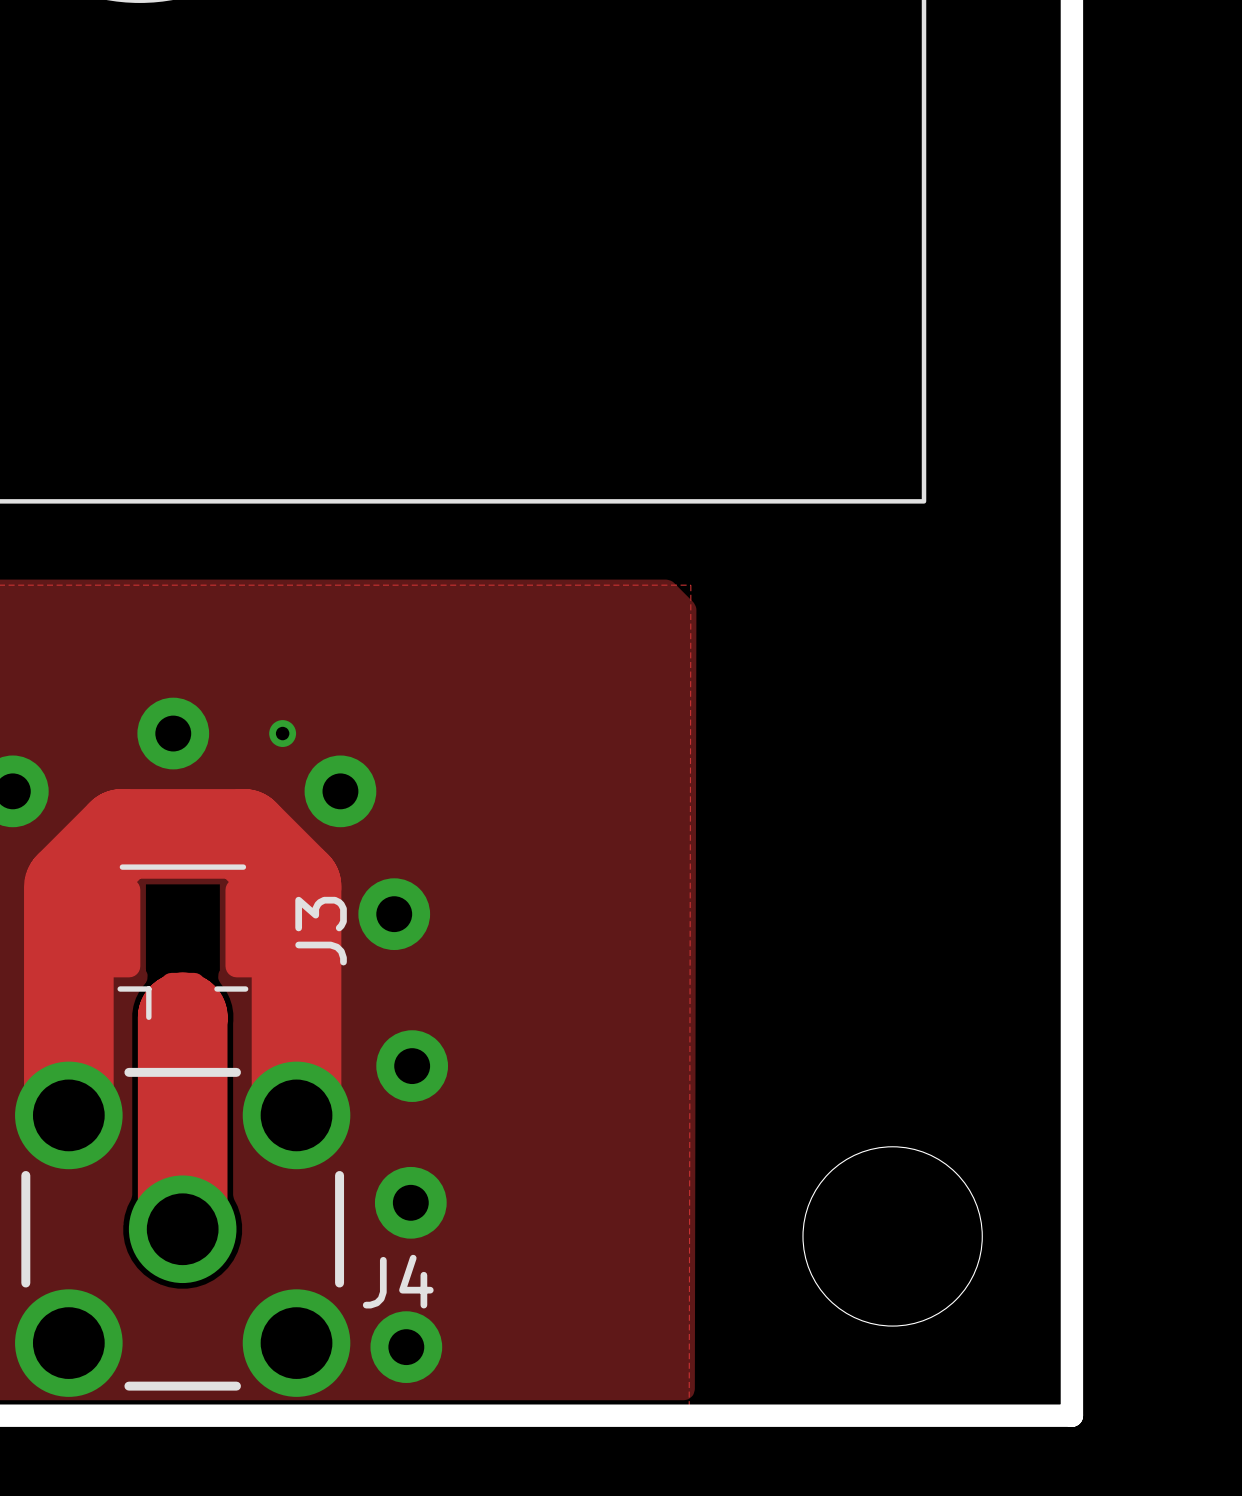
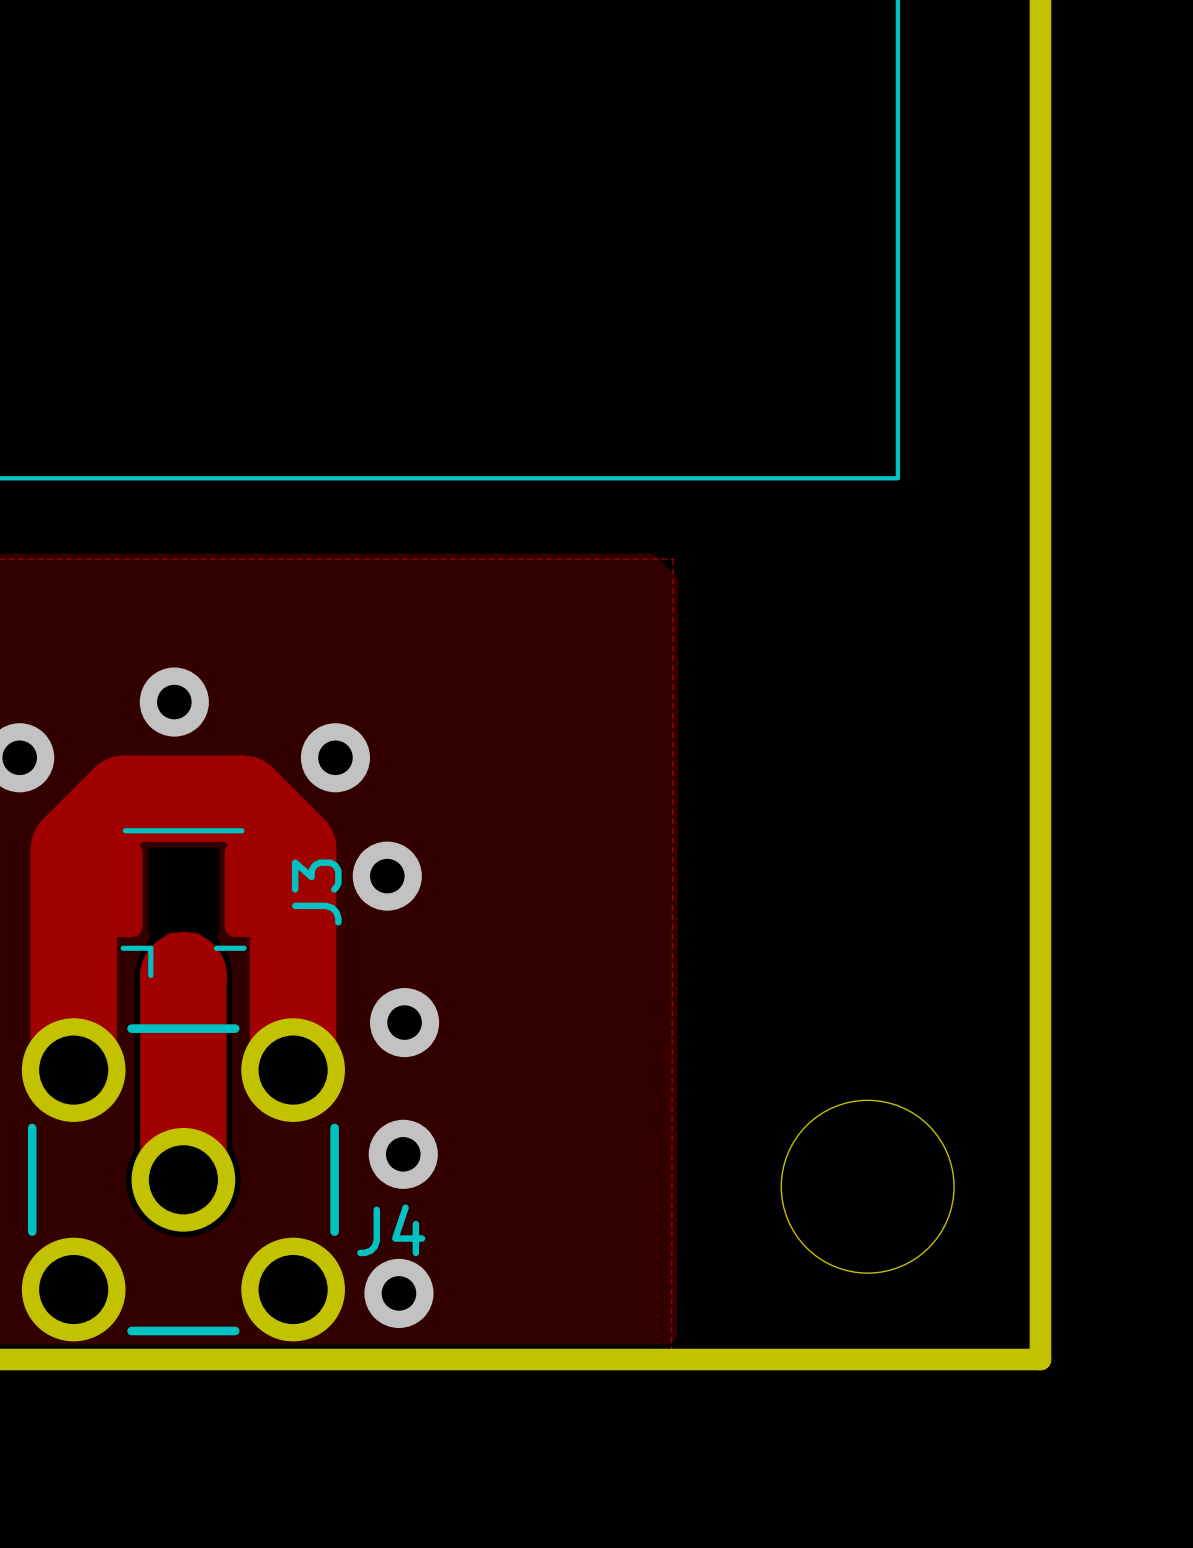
via: (282, 733) -> none

